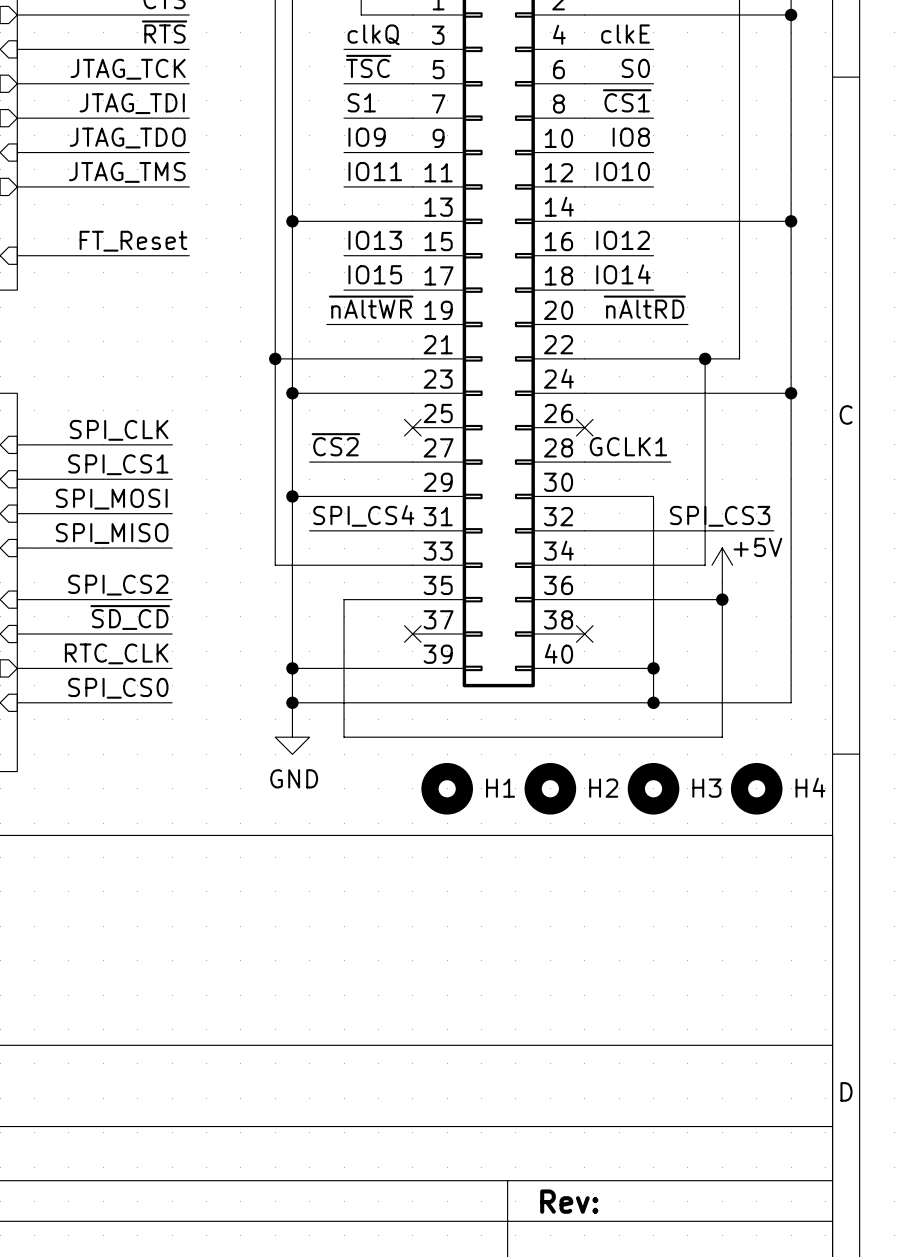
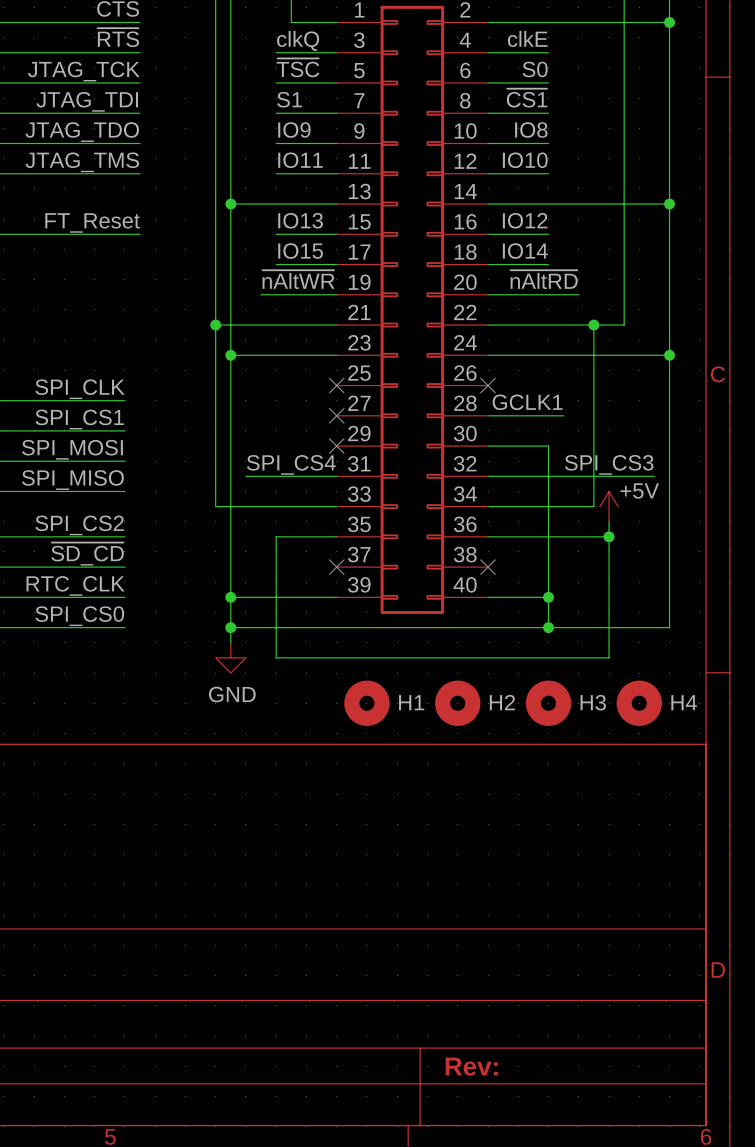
label: ~{CS2} (335, 444) -> none
wire: (309, 462) (412, 462) -> none
no-connect mark: none -> (336, 415)
wire: (292, 496) (412, 496) -> none
junction: (292, 496) -> none
no-connect mark: none -> (336, 446)

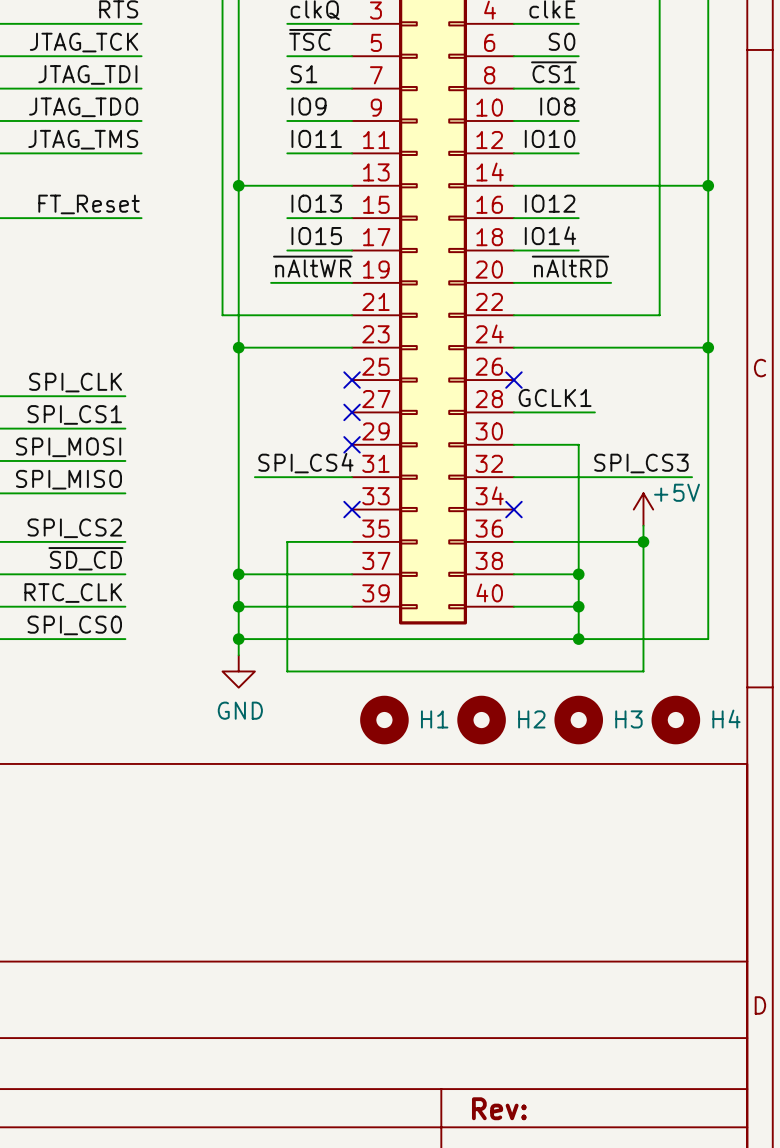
wire: (215, 325) (215, 506) (336, 506) -> none
junction: (215, 325) -> none
wire: (593, 325) (593, 506) (488, 506) -> none
junction: (593, 325) -> none
wire: none -> (238, 574) (352, 574)
junction: none -> (238, 574)
no-connect mark position: (336, 567) -> (352, 509)
wire: none -> (513, 574) (578, 574)
no-connect mark position: (488, 567) -> (513, 509)
junction: none -> (578, 574)

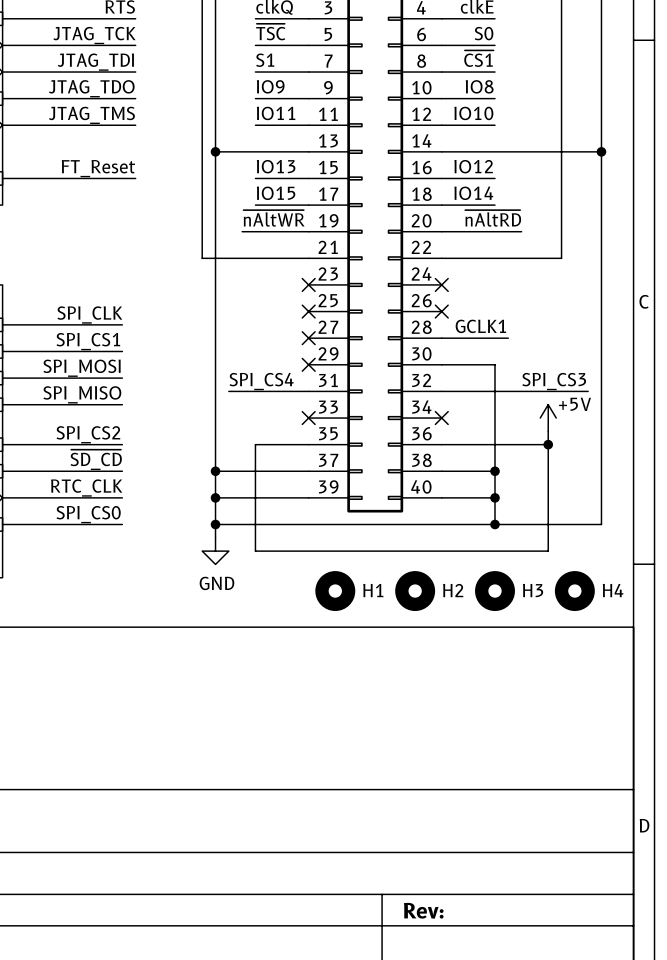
wire: (238, 347) (352, 347) -> none
junction: (238, 347) -> none
no-connect mark: none -> (308, 284)
wire: (513, 347) (708, 347) -> none
no-connect mark: none -> (441, 284)
junction: (708, 347) -> none

